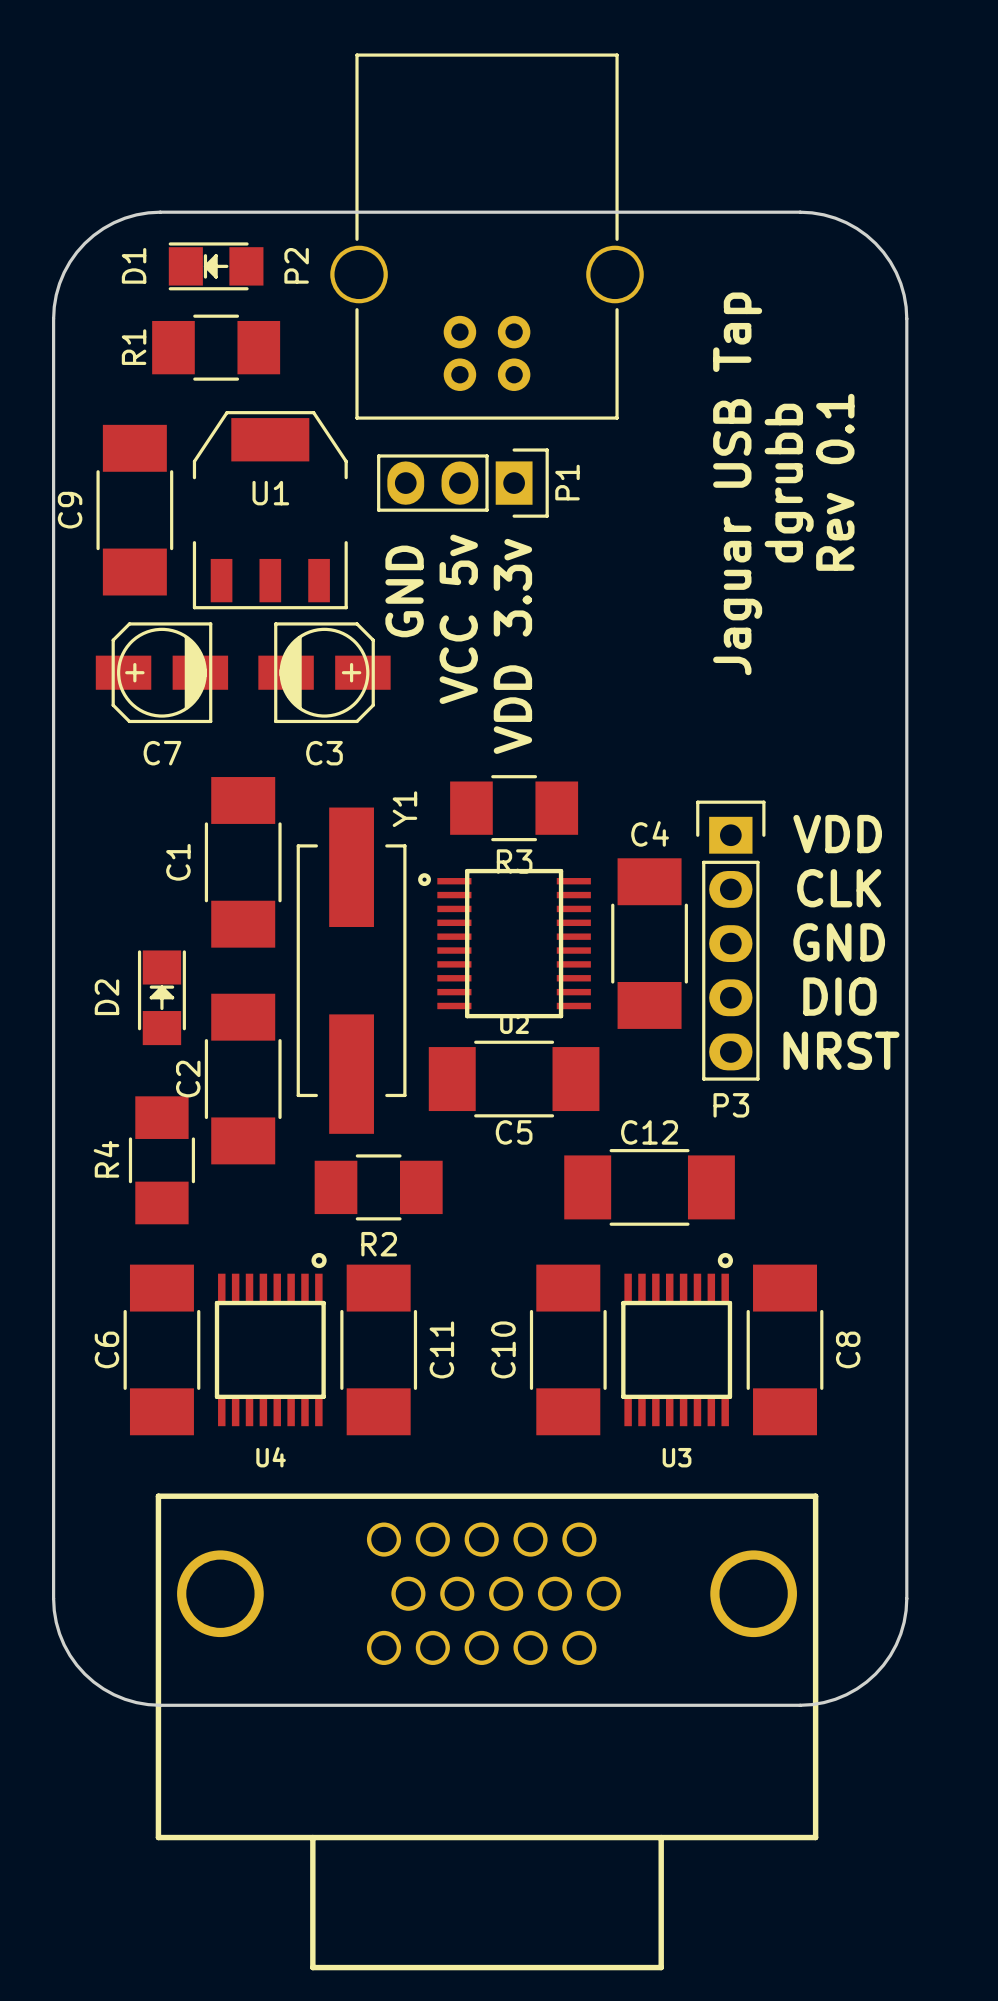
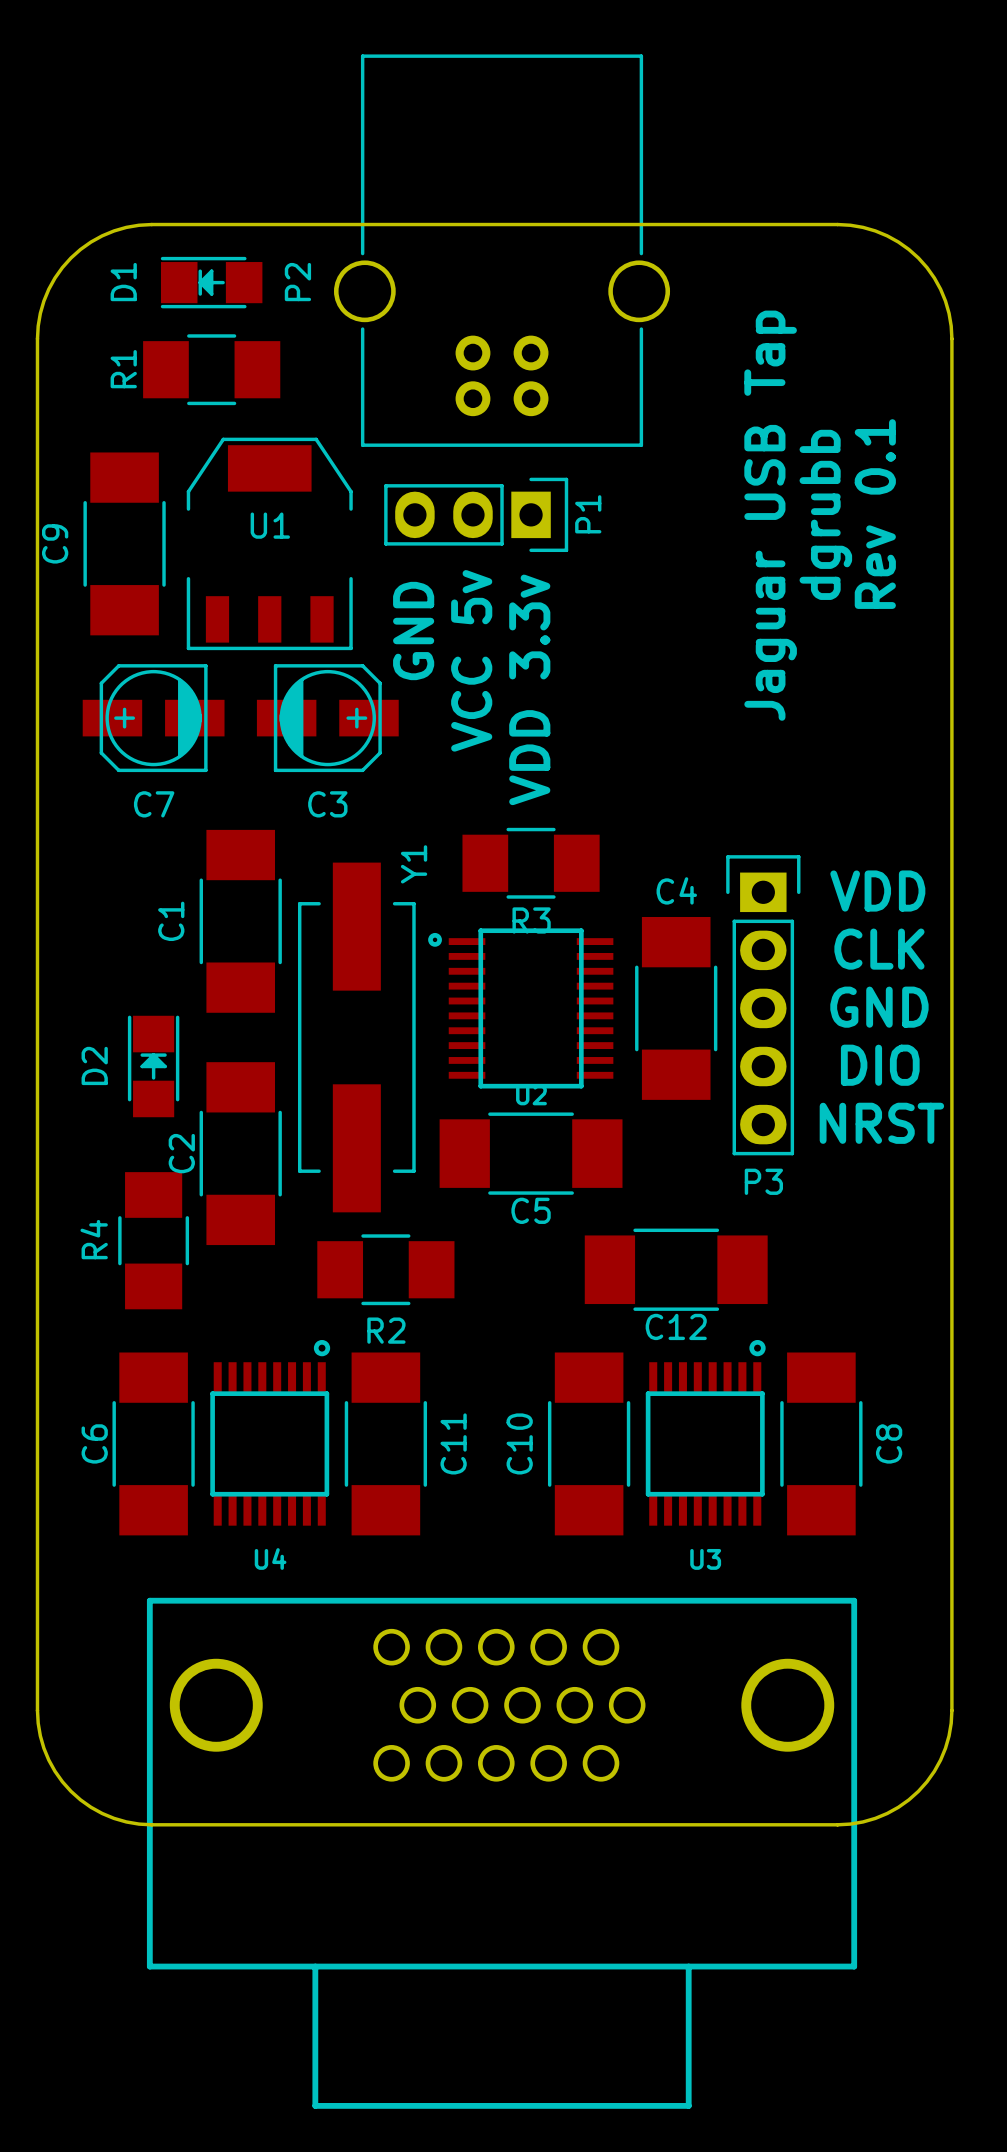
C12 name position: C12 (649, 1132) -> C12 (676, 1326)

